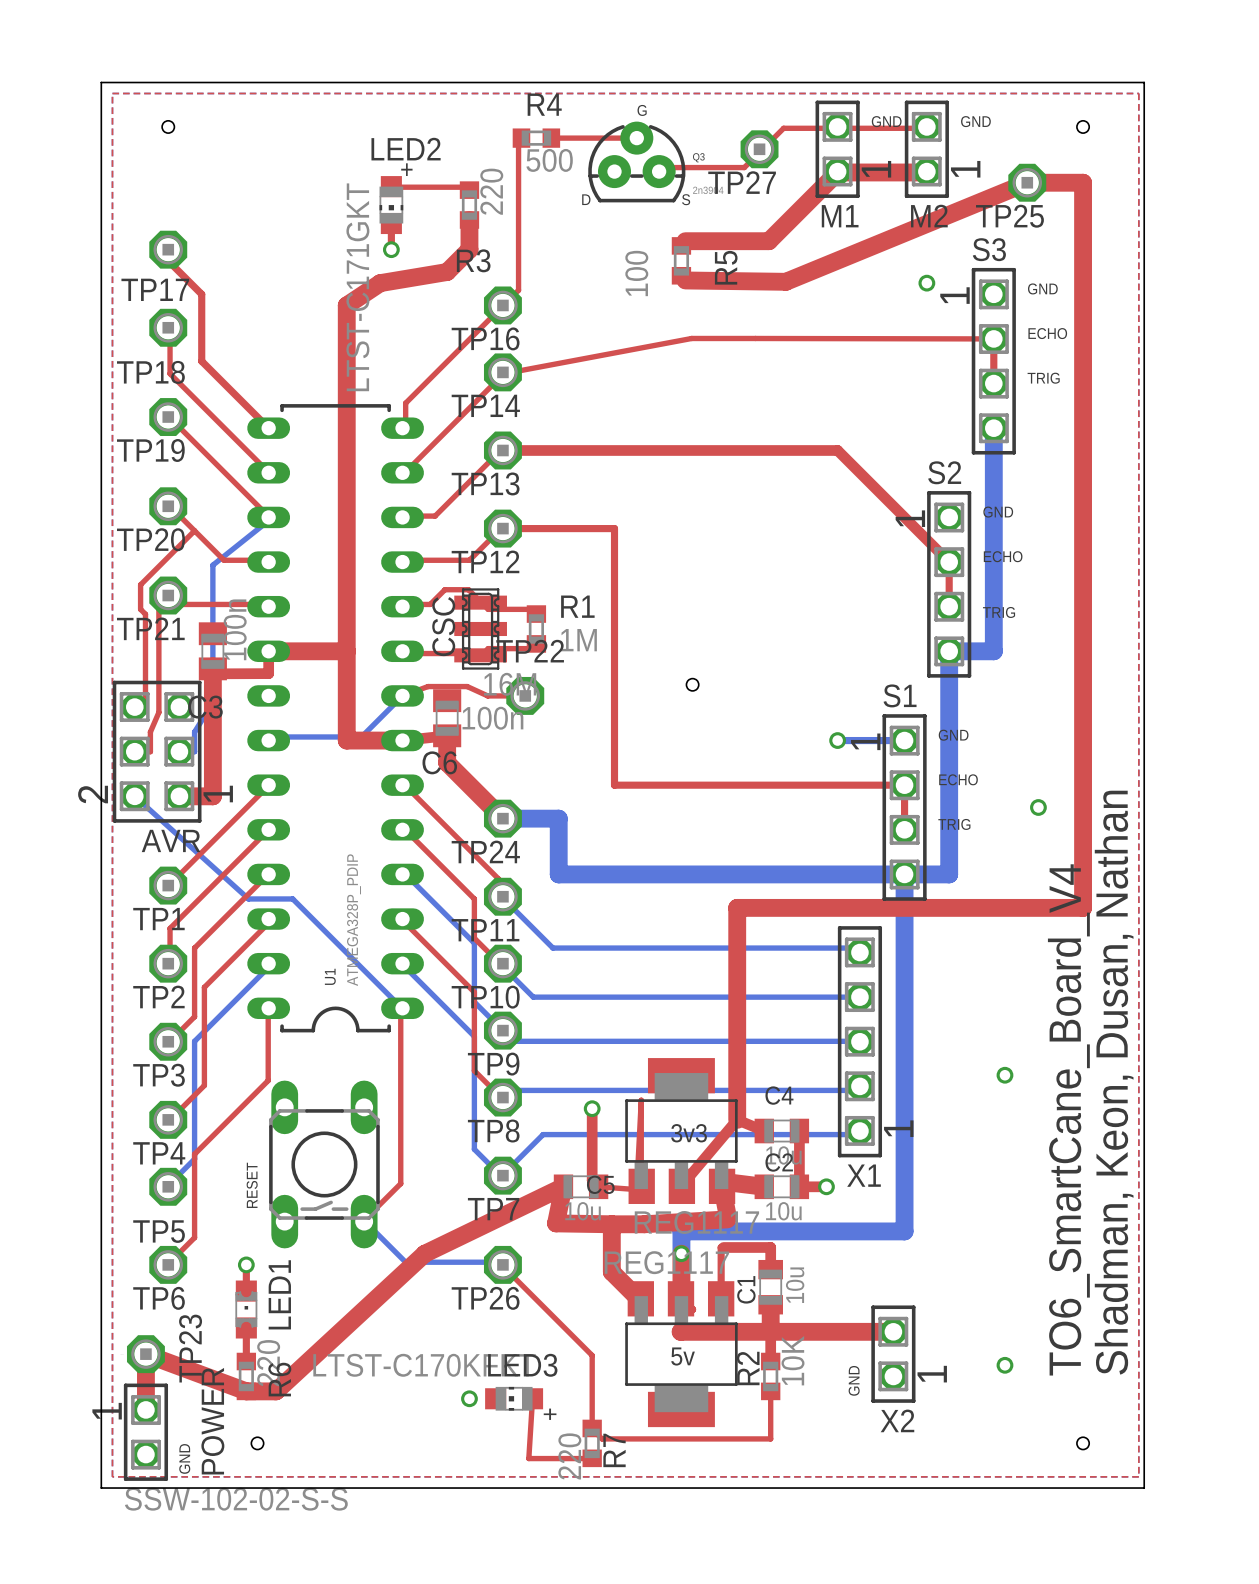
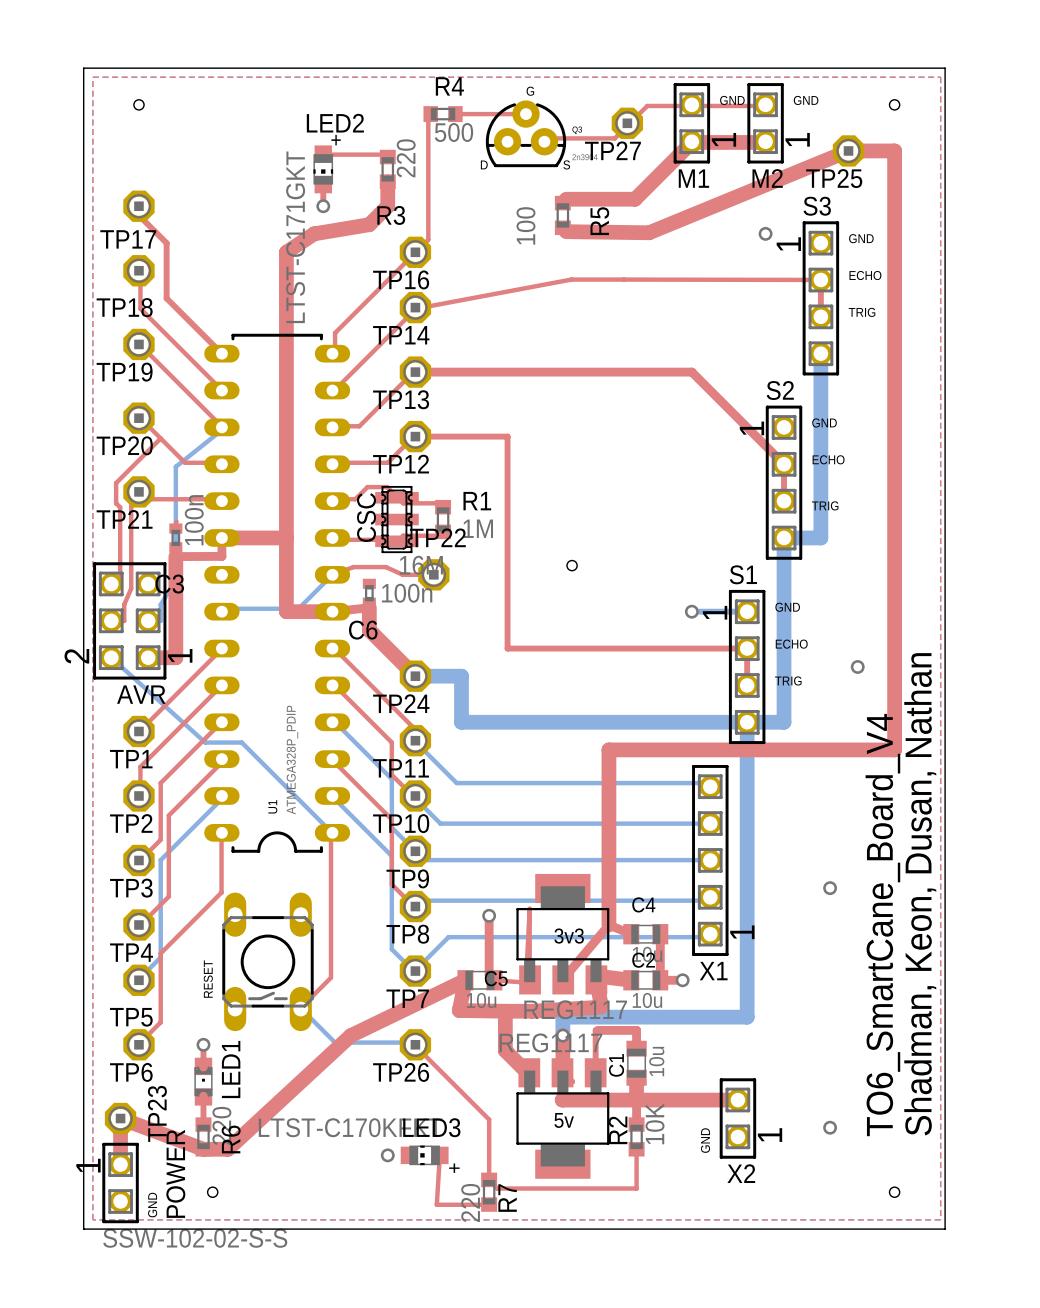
C3 footprint: [198, 622, 227, 681] -> [169, 523, 183, 553]
C6 footprint: [433, 689, 462, 748] -> [362, 578, 376, 608]

